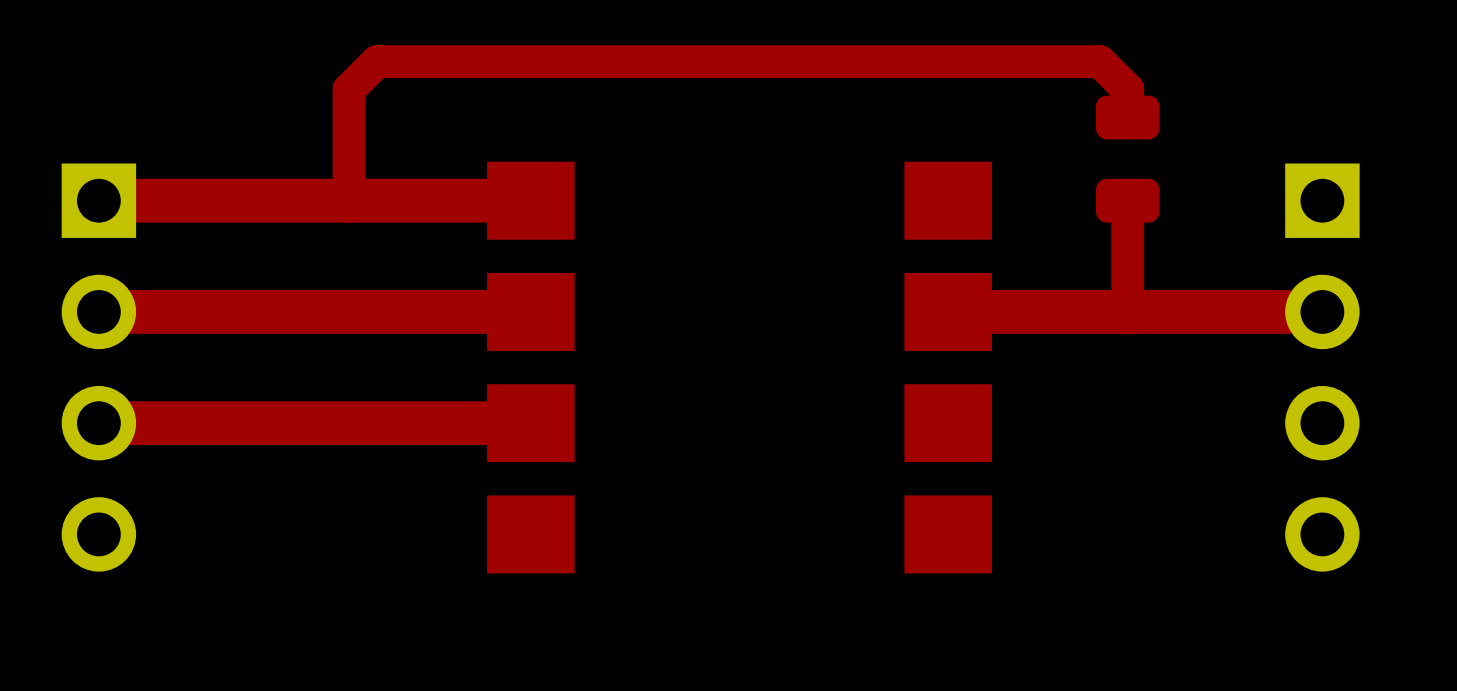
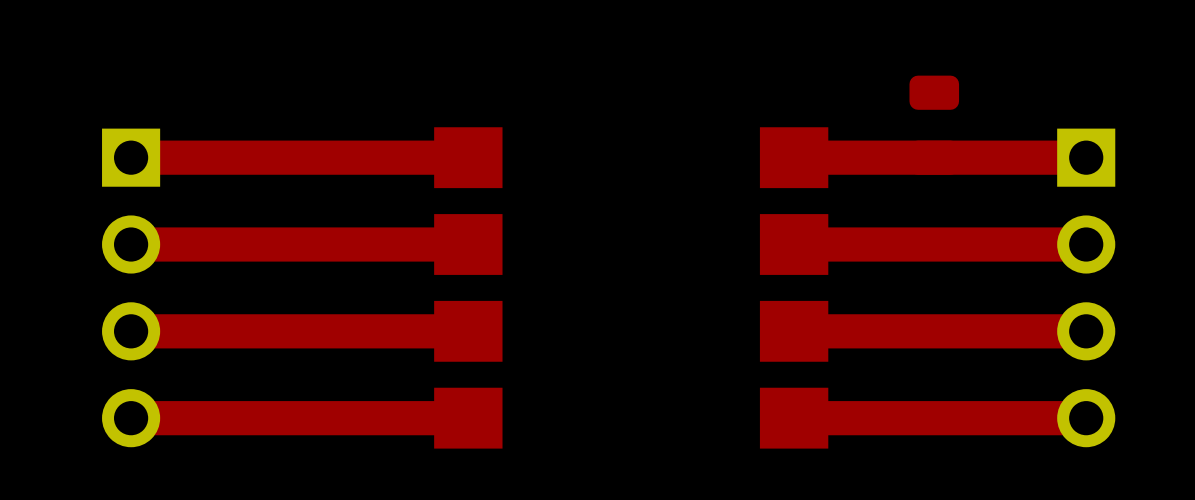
top track: (1127, 117) (1127, 89) (1099, 61) (376, 61) (349, 89) (349, 200) -> none
top track: (1127, 200) (1127, 311) -> none
top track: none -> (1086, 157) (827, 157)
top track: none -> (1086, 331) (827, 331)
top track: none -> (434, 418) (131, 418)
top track: none -> (1086, 418) (827, 418)

